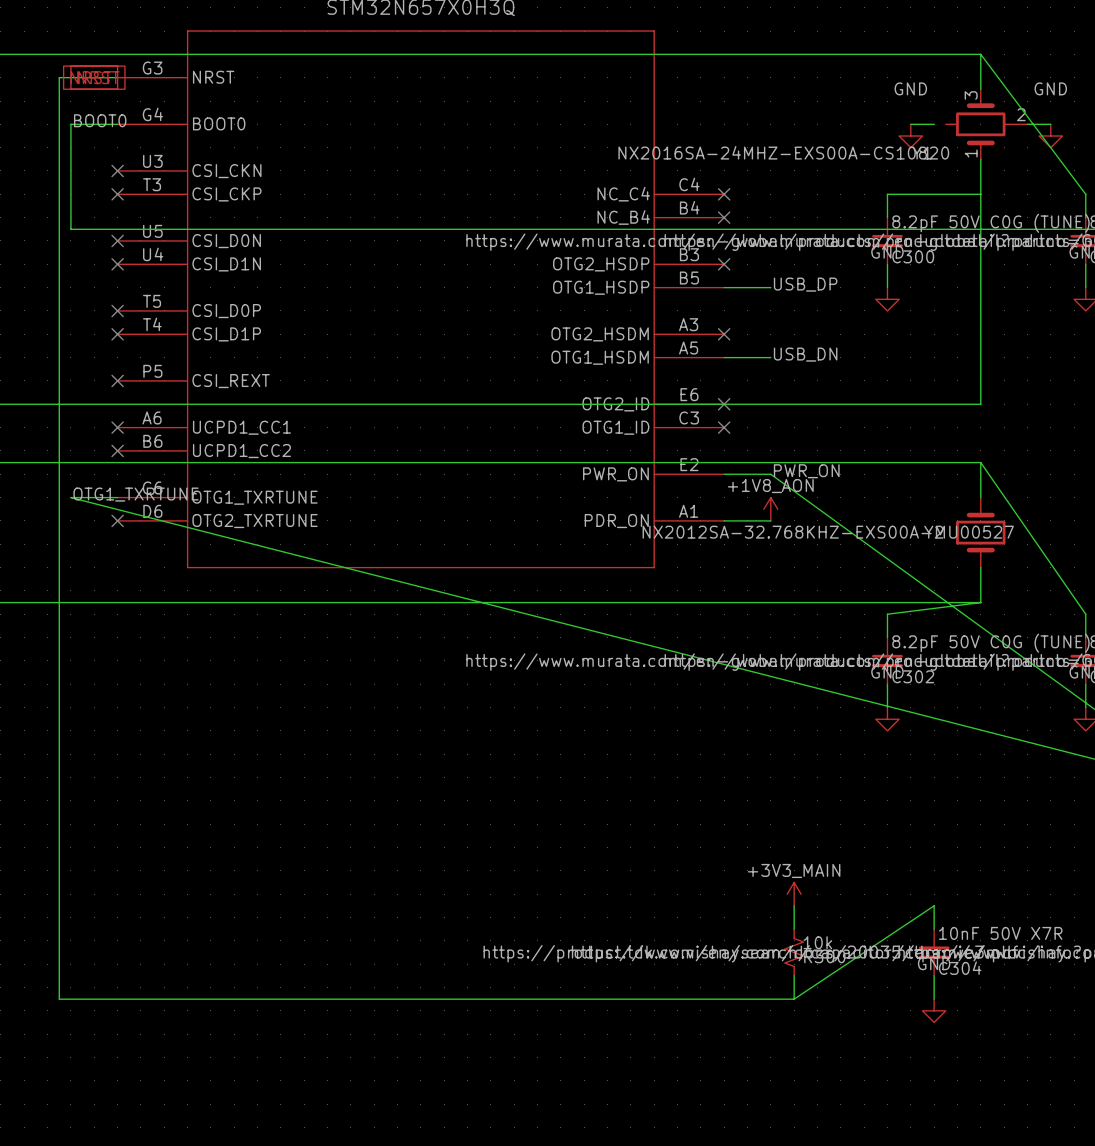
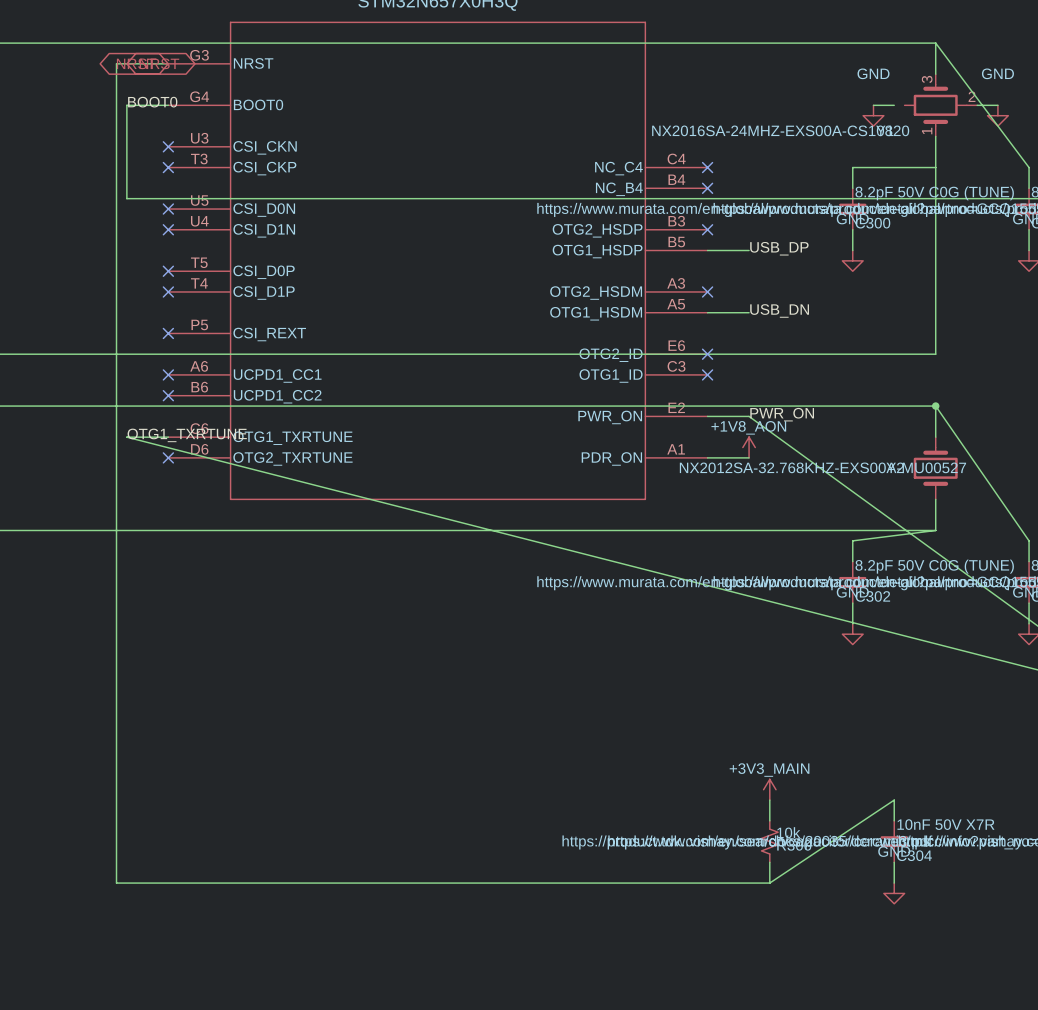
global label shape: passive (91, 77) -> bidirectional (136, 63)
global label shape: passive (99, 77) -> bidirectional (159, 63)
junction: none -> (935, 406)

